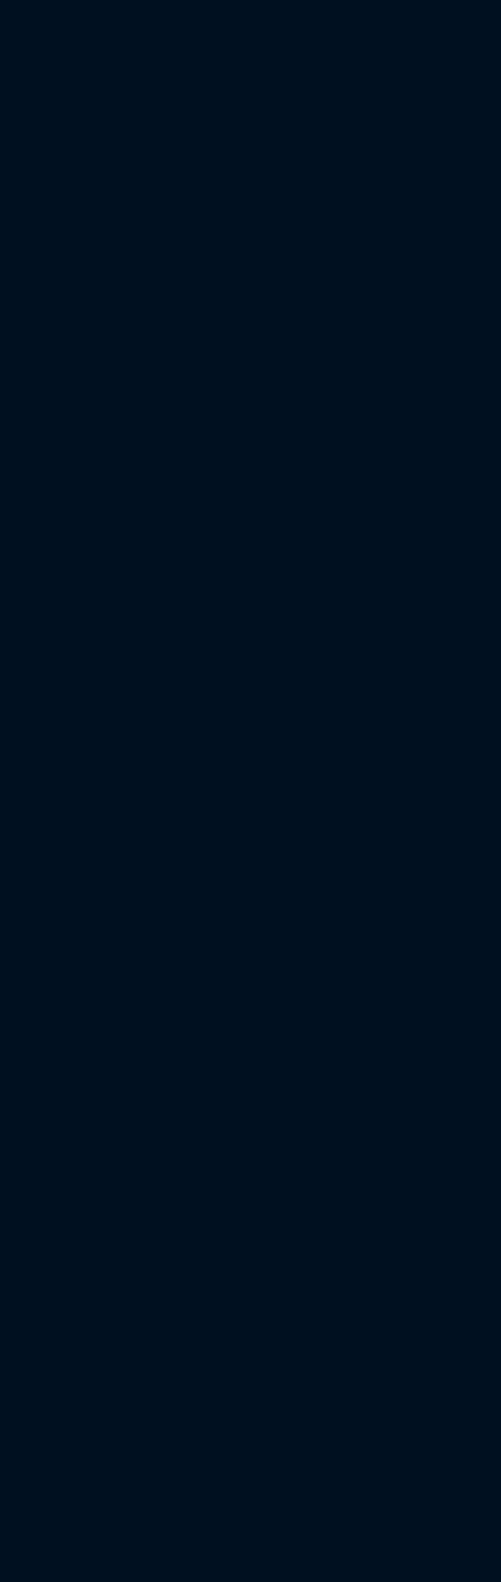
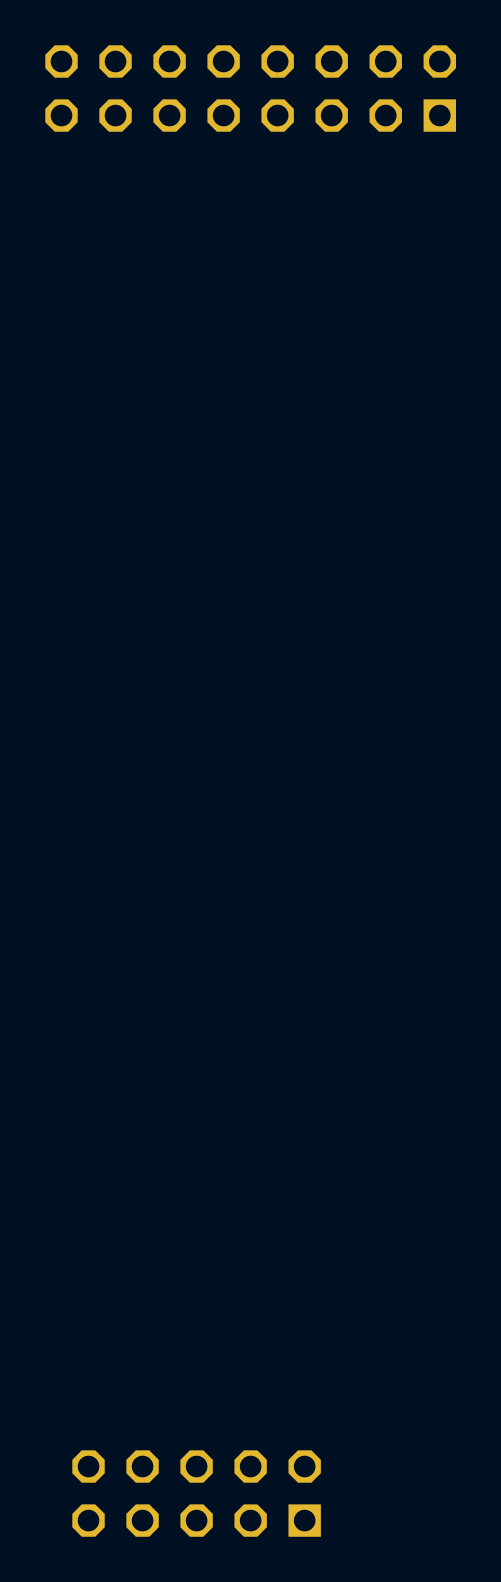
part: none -> (250, 88)
part: none -> (196, 1493)

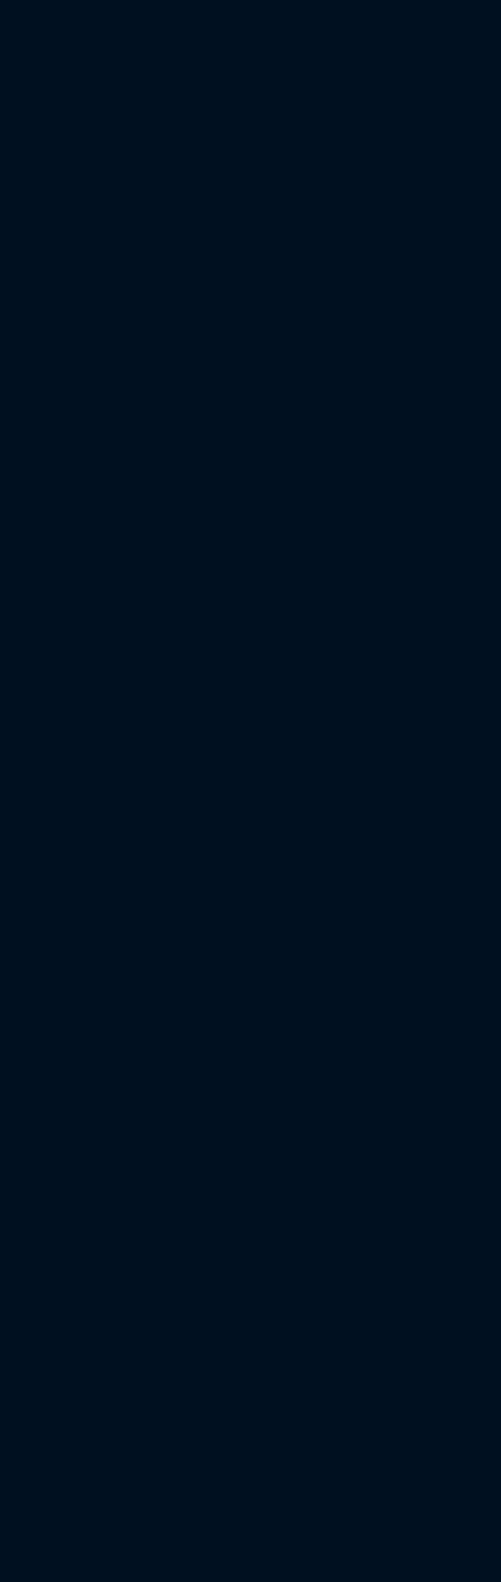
part: (250, 88) -> none
part: (196, 1493) -> none

